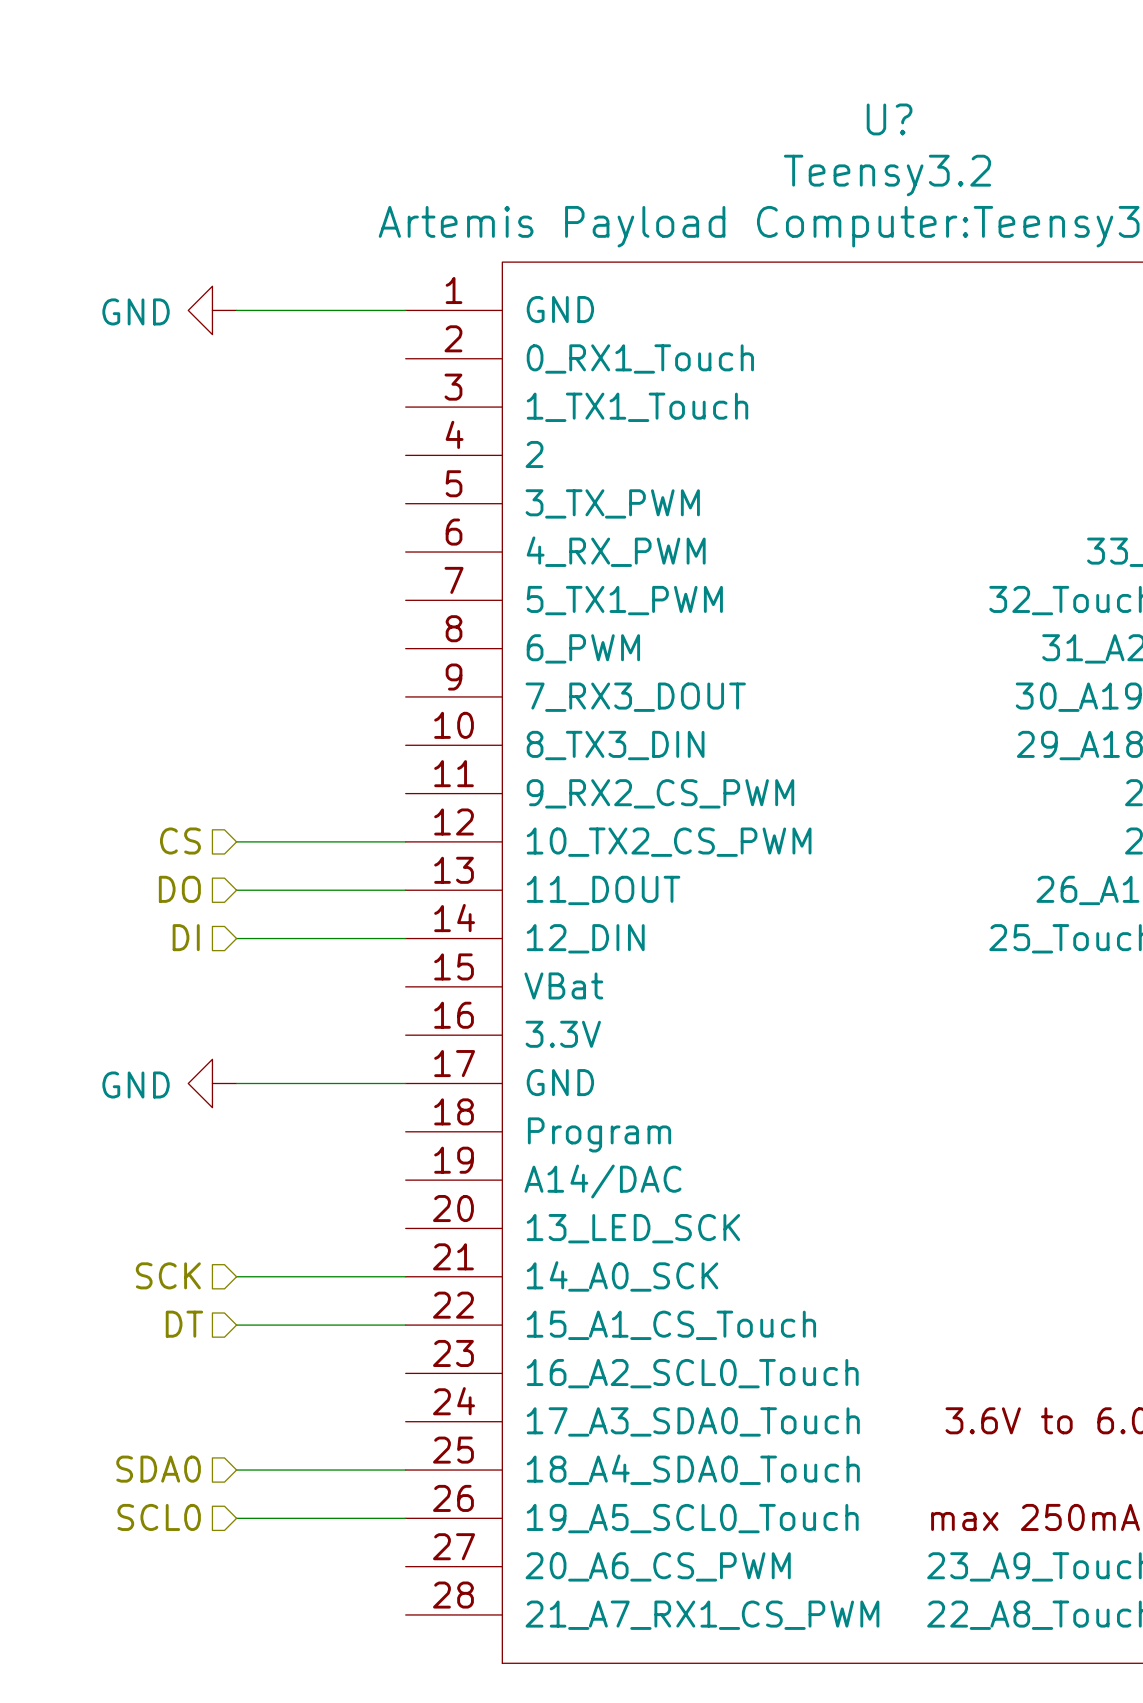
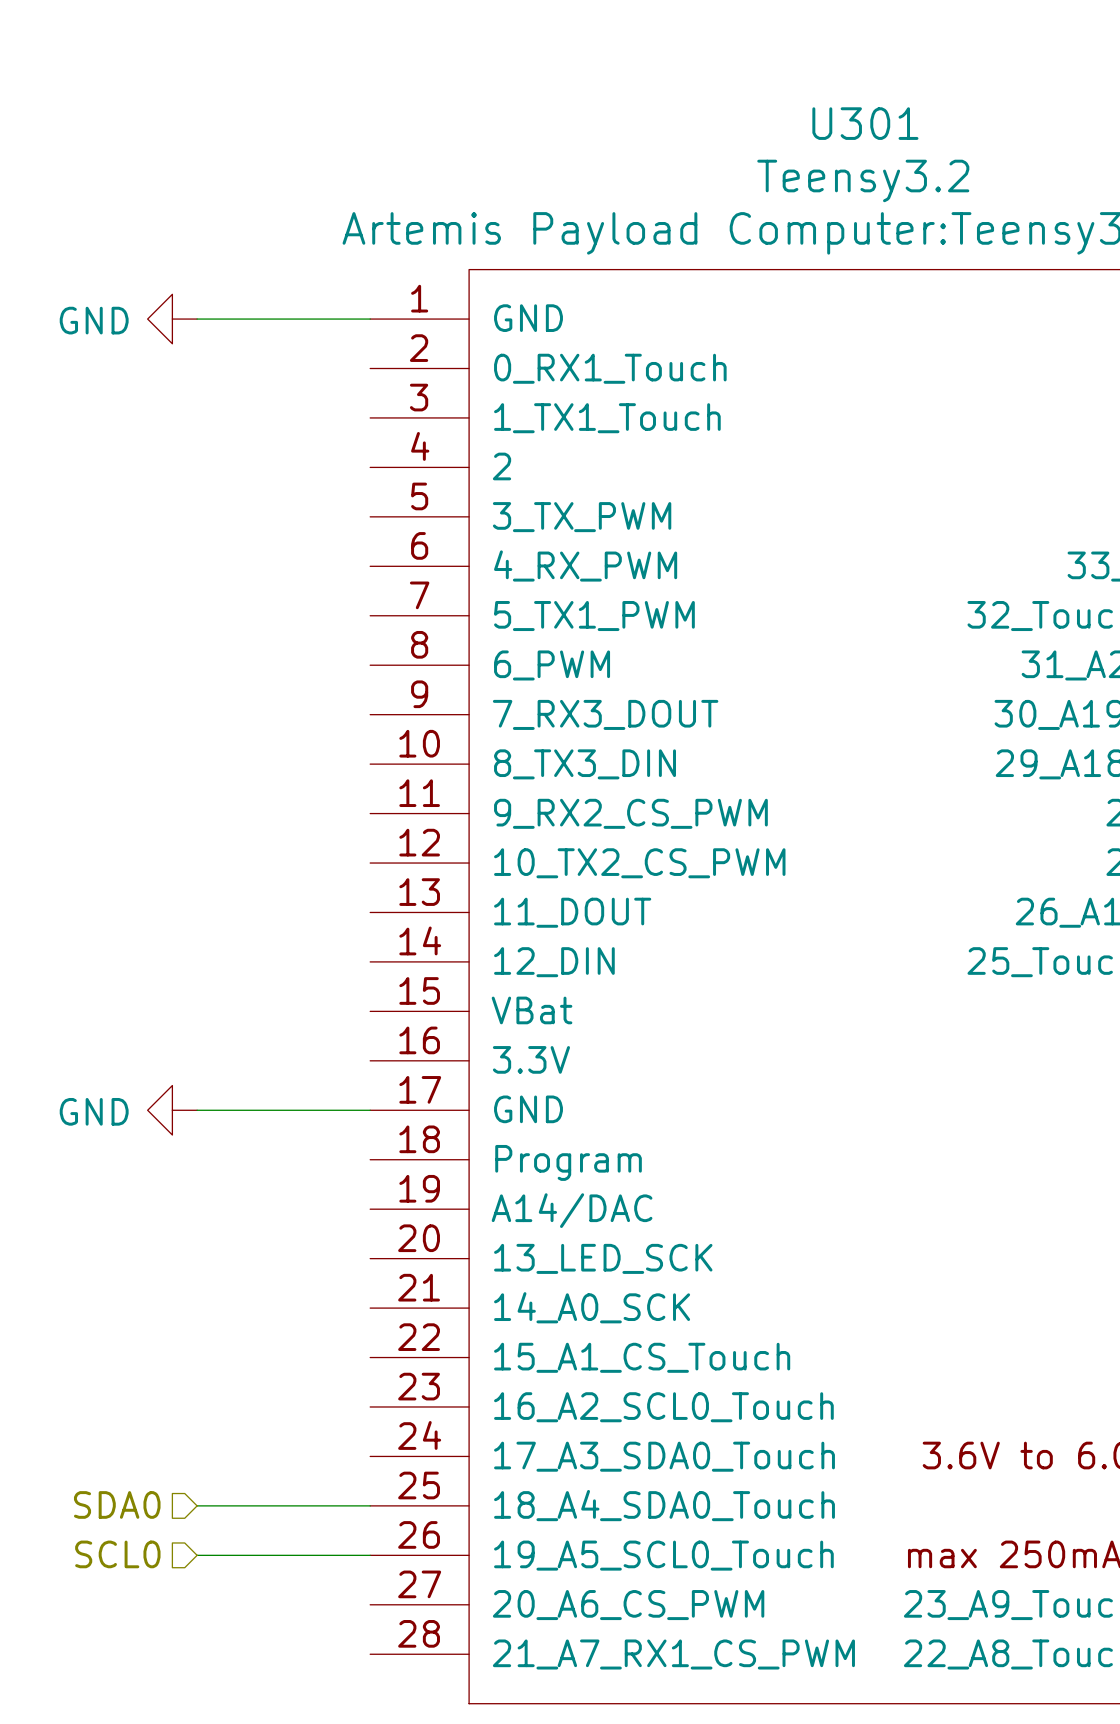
U? name: U? (889, 119) -> U301 (865, 123)
hierarchical label: CS (180, 841) -> none
wire: (236, 841) (405, 841) -> none
hierarchical label: DO (179, 889) -> none
wire: (236, 890) (405, 890) -> none
hierarchical label: DI (186, 937) -> none
wire: (236, 938) (405, 938) -> none
hierarchical label: SCK (168, 1275) -> none
wire: (236, 1276) (405, 1276) -> none
hierarchical label: DT (184, 1324) -> none
wire: (236, 1325) (405, 1325) -> none

